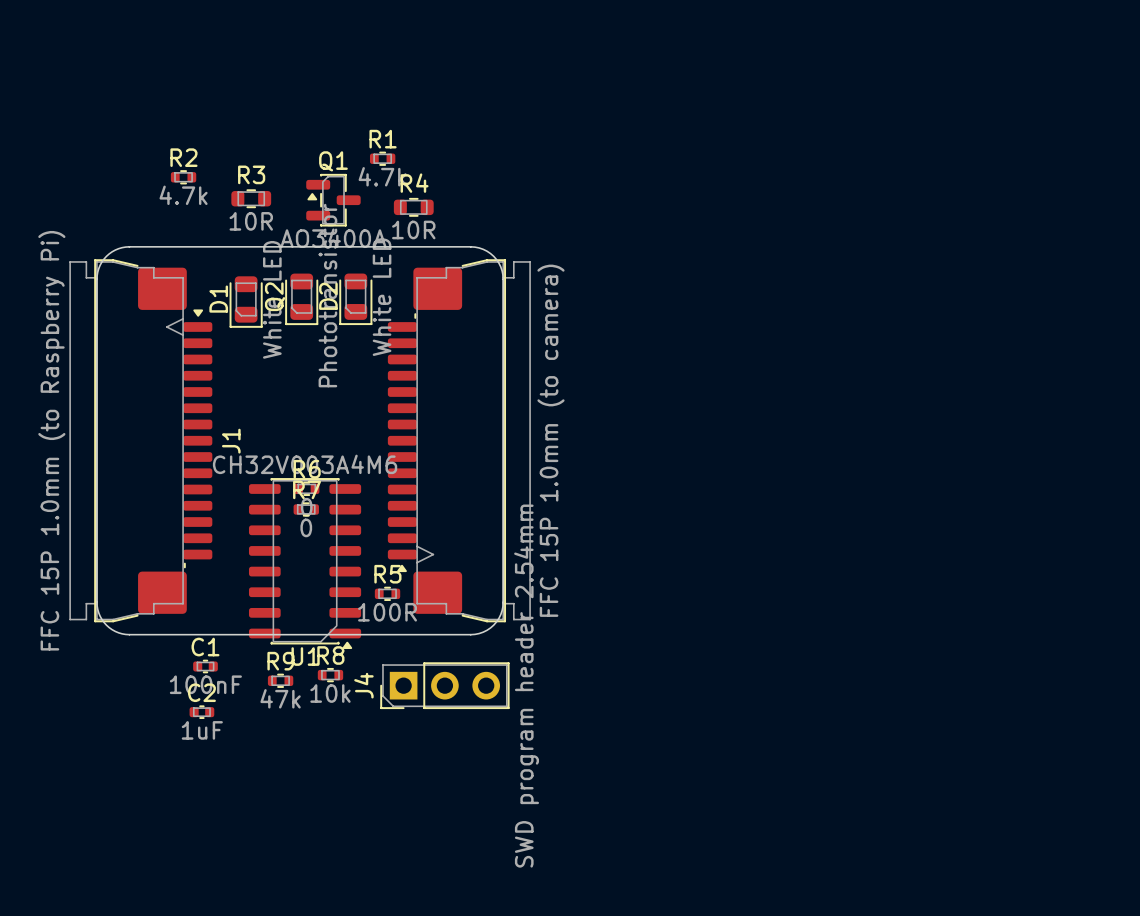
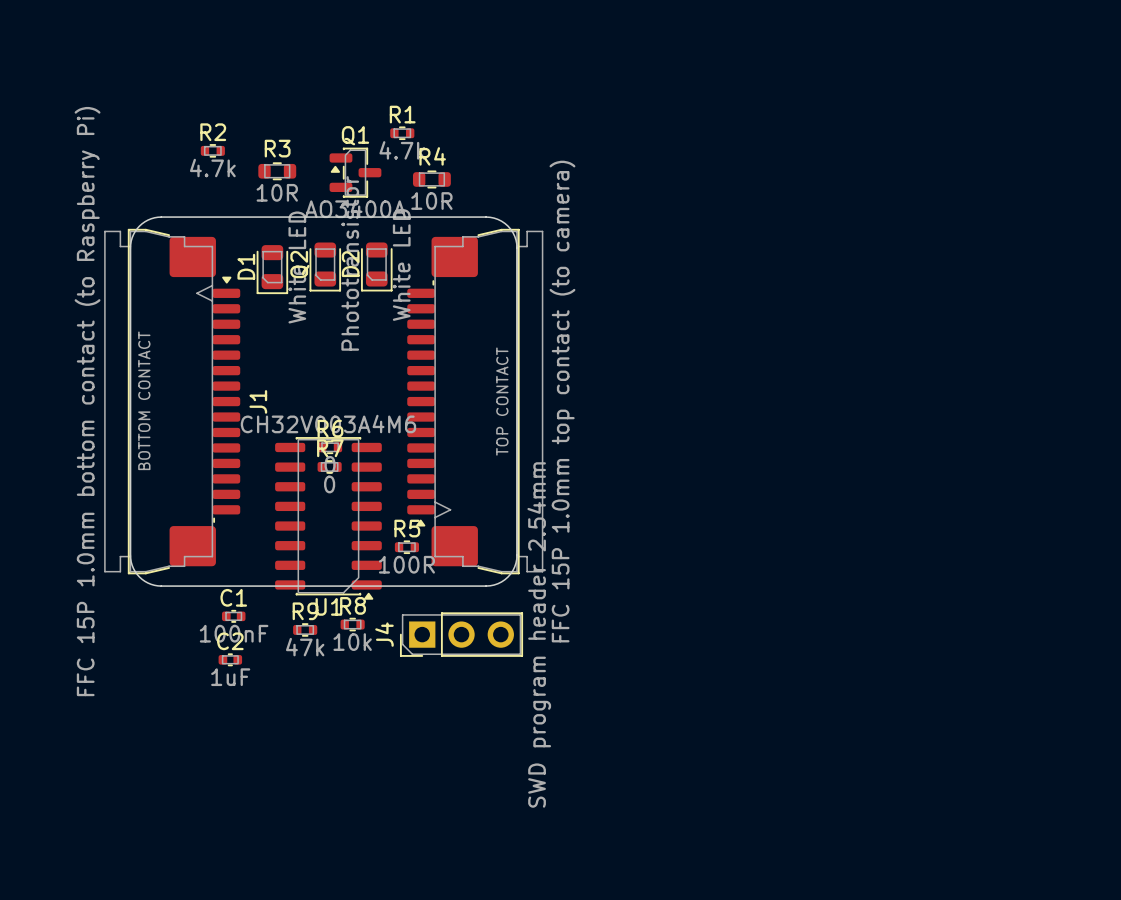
J1 text: none -> BOTTOM CONTACT (144, 400)
J1 value: FFC 15P 1.0mm (to Raspberry Pi) (51, 440) -> FFC 15P 1.0mm bottom contact (to Raspberry Pi) (87, 401)
part text: none -> TOP CONTACT (502, 401)
part value: FFC 15P 1.0mm (to camera) (550, 440) -> FFC 15P 1.0mm top contact (to camera) (562, 401)

